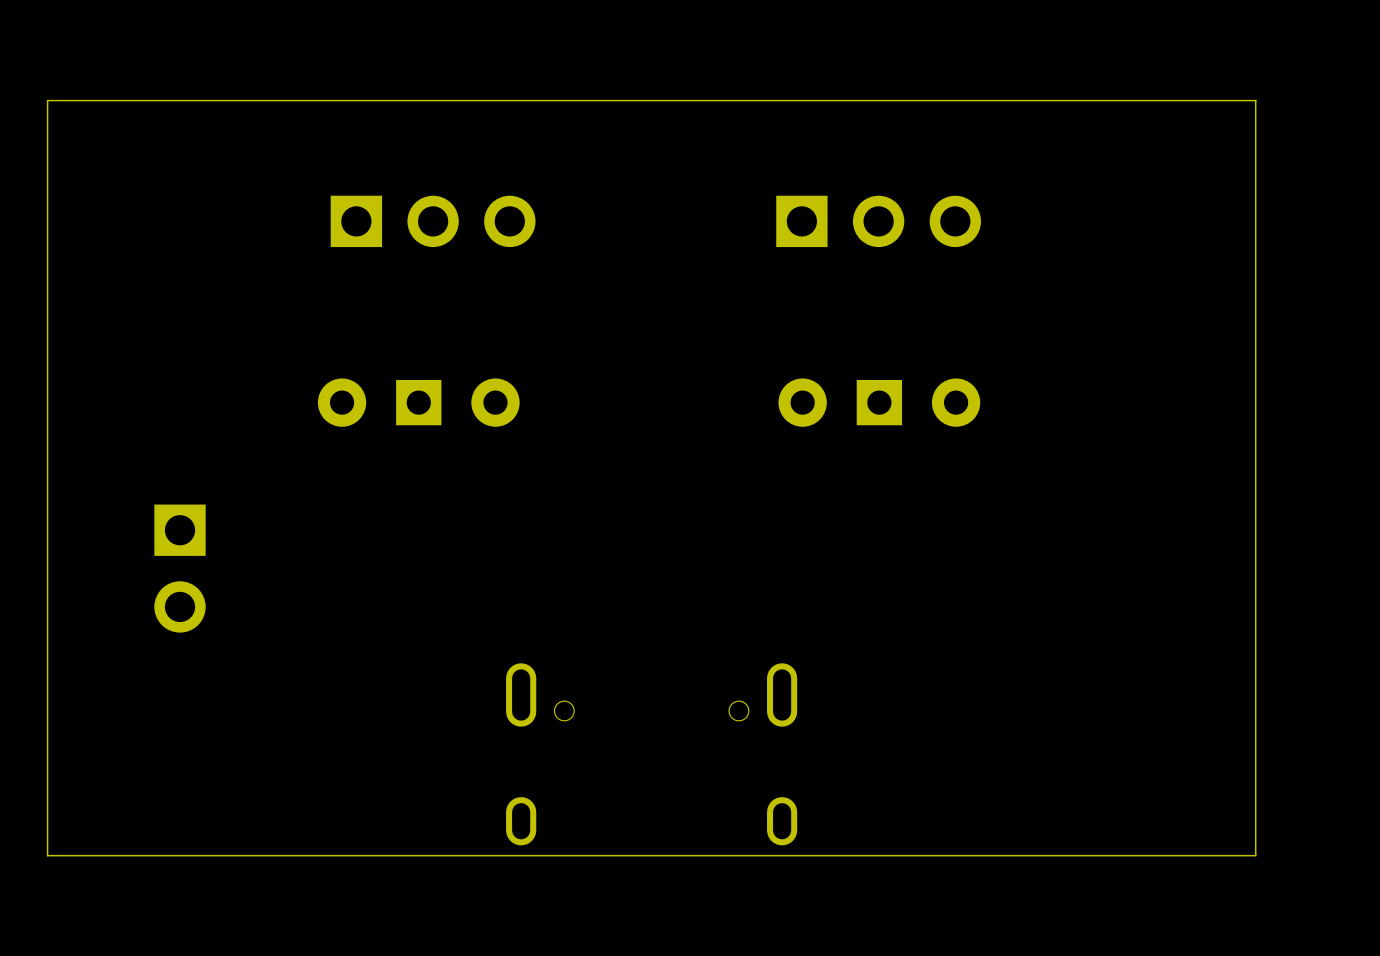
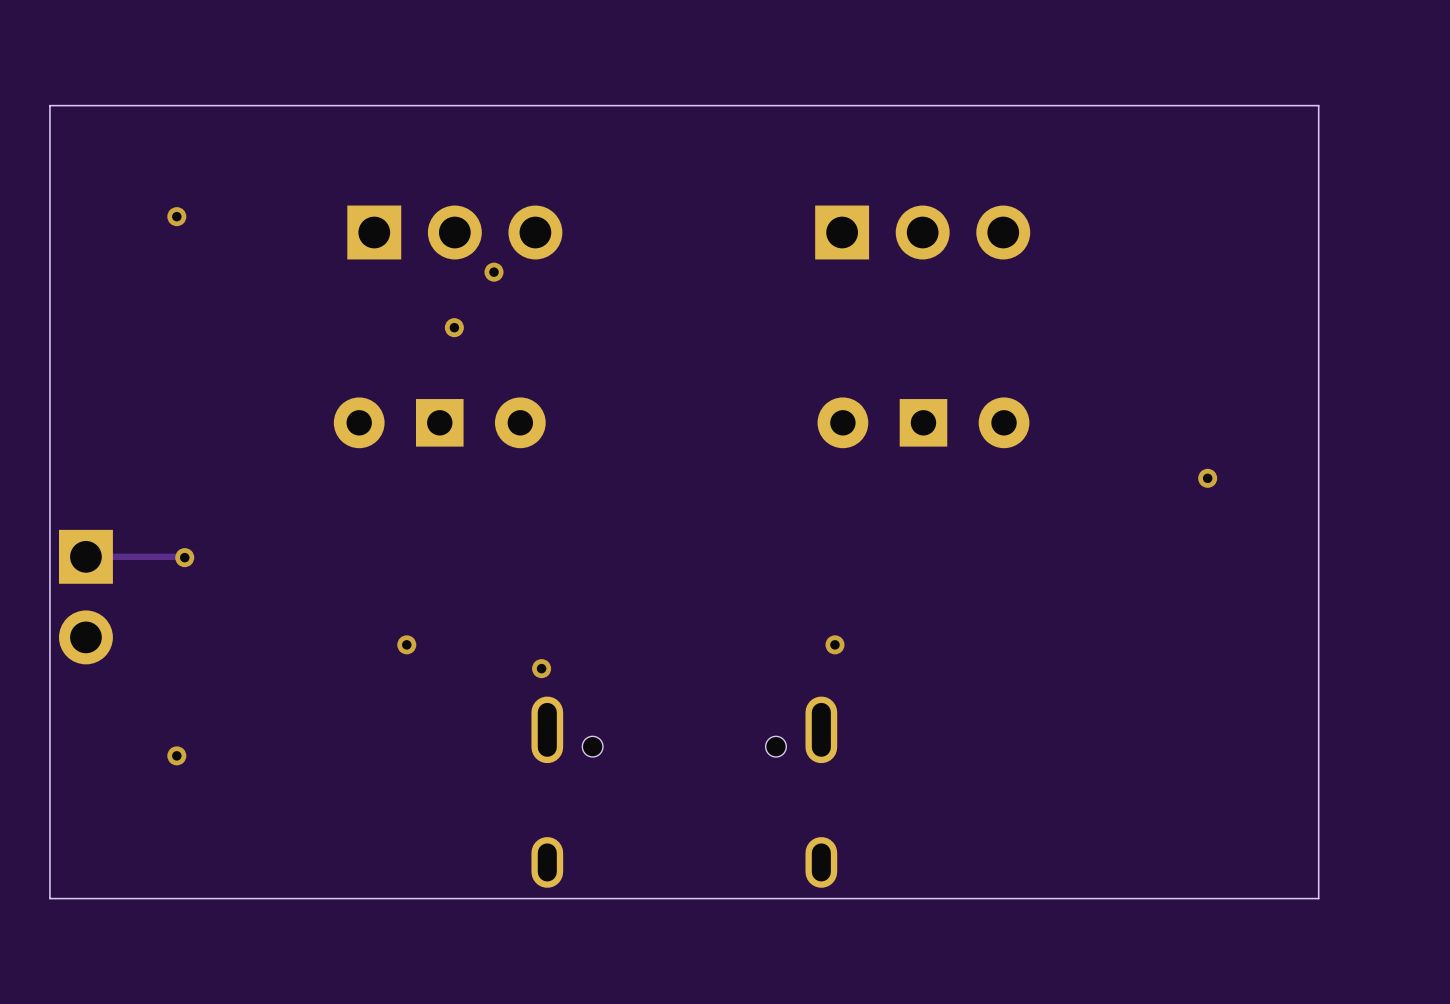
via: none -> (176, 216)
via: none -> (494, 272)
via: none -> (454, 327)
via: none -> (1207, 478)
track: none -> (93, 556) (184, 557)
via: none -> (184, 557)
part position: (180, 568) -> (85, 597)
via: none -> (406, 644)
via: none -> (834, 644)
via: none -> (541, 668)
via: none -> (176, 755)

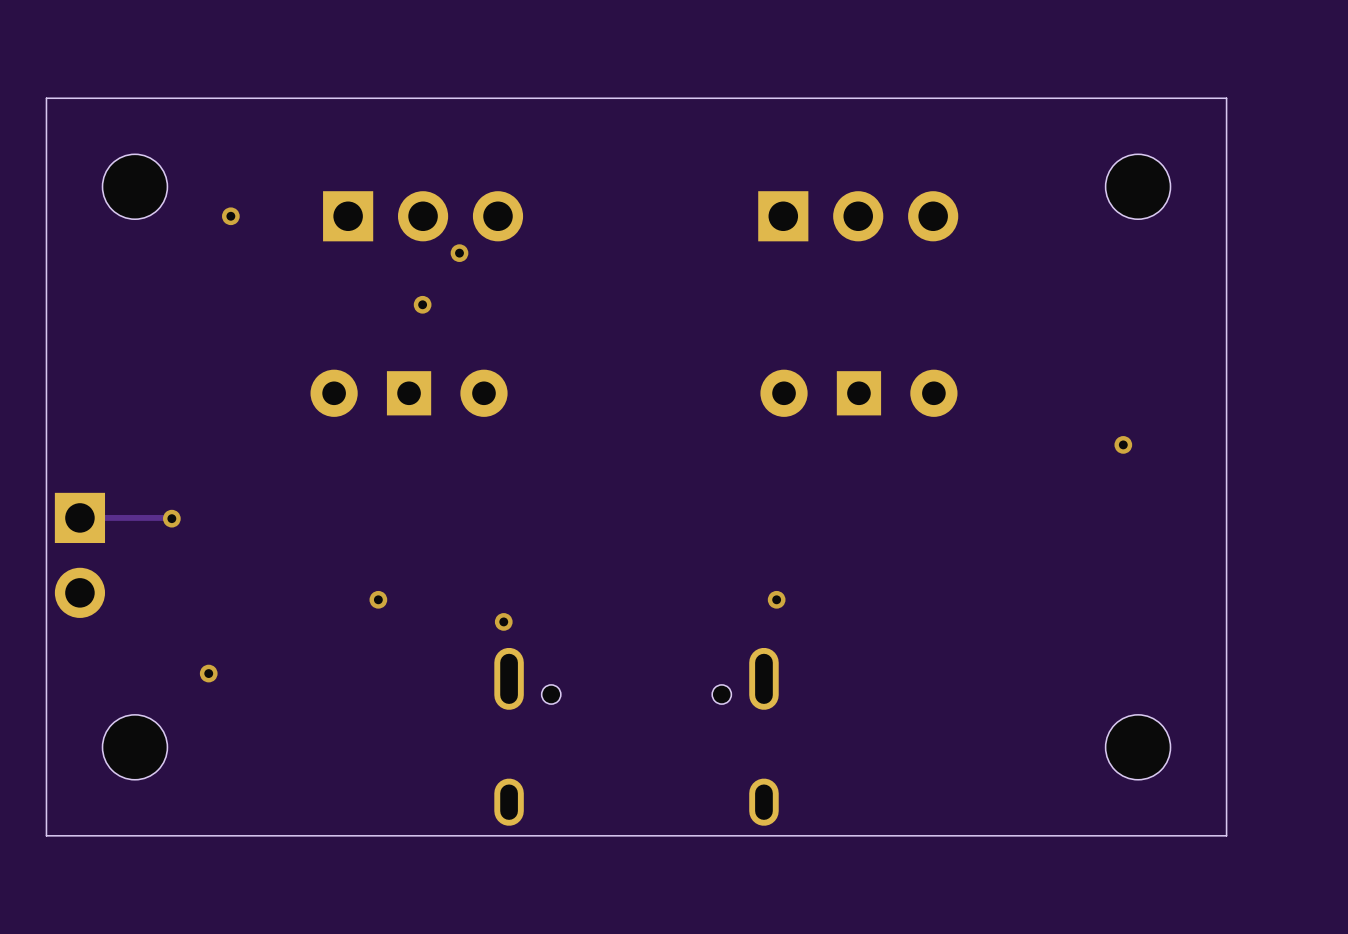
part: none -> (134, 186)
part: none -> (1138, 186)
via position: (176, 216) -> (230, 216)
via position: (176, 755) -> (208, 673)
part: none -> (134, 747)
part: none -> (1138, 747)

